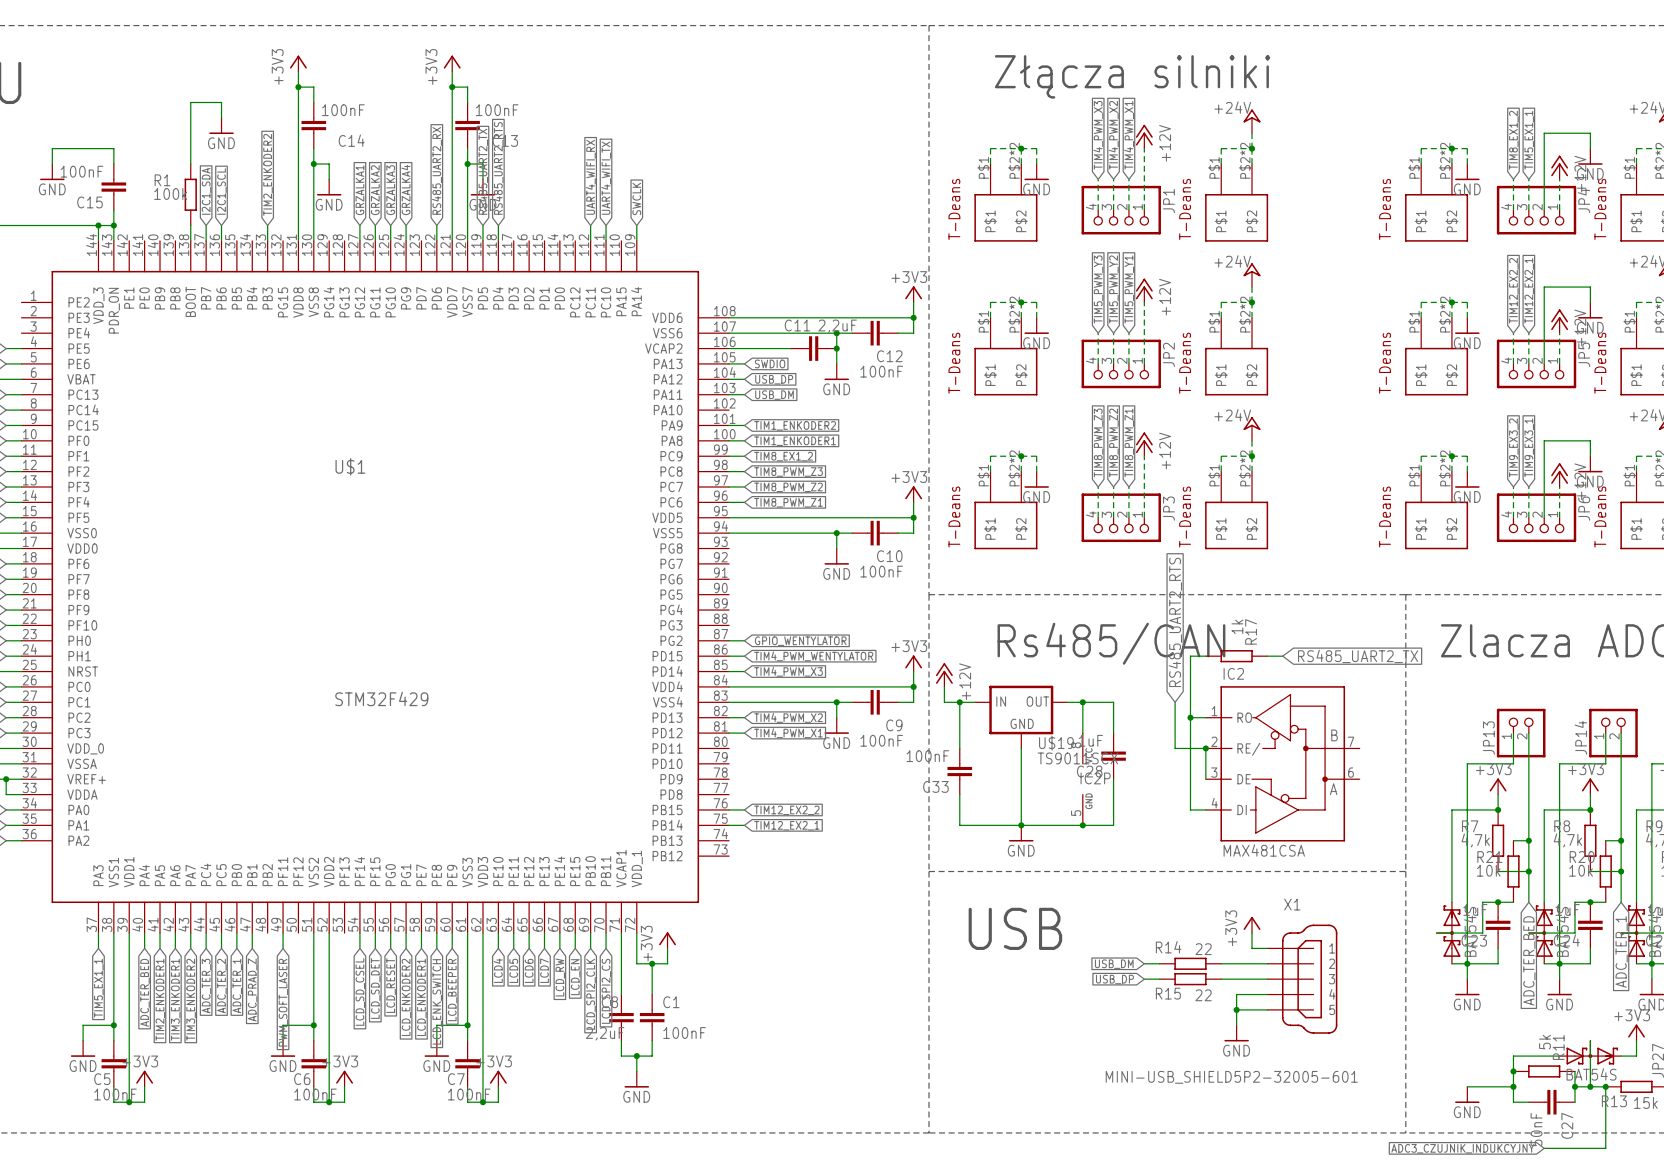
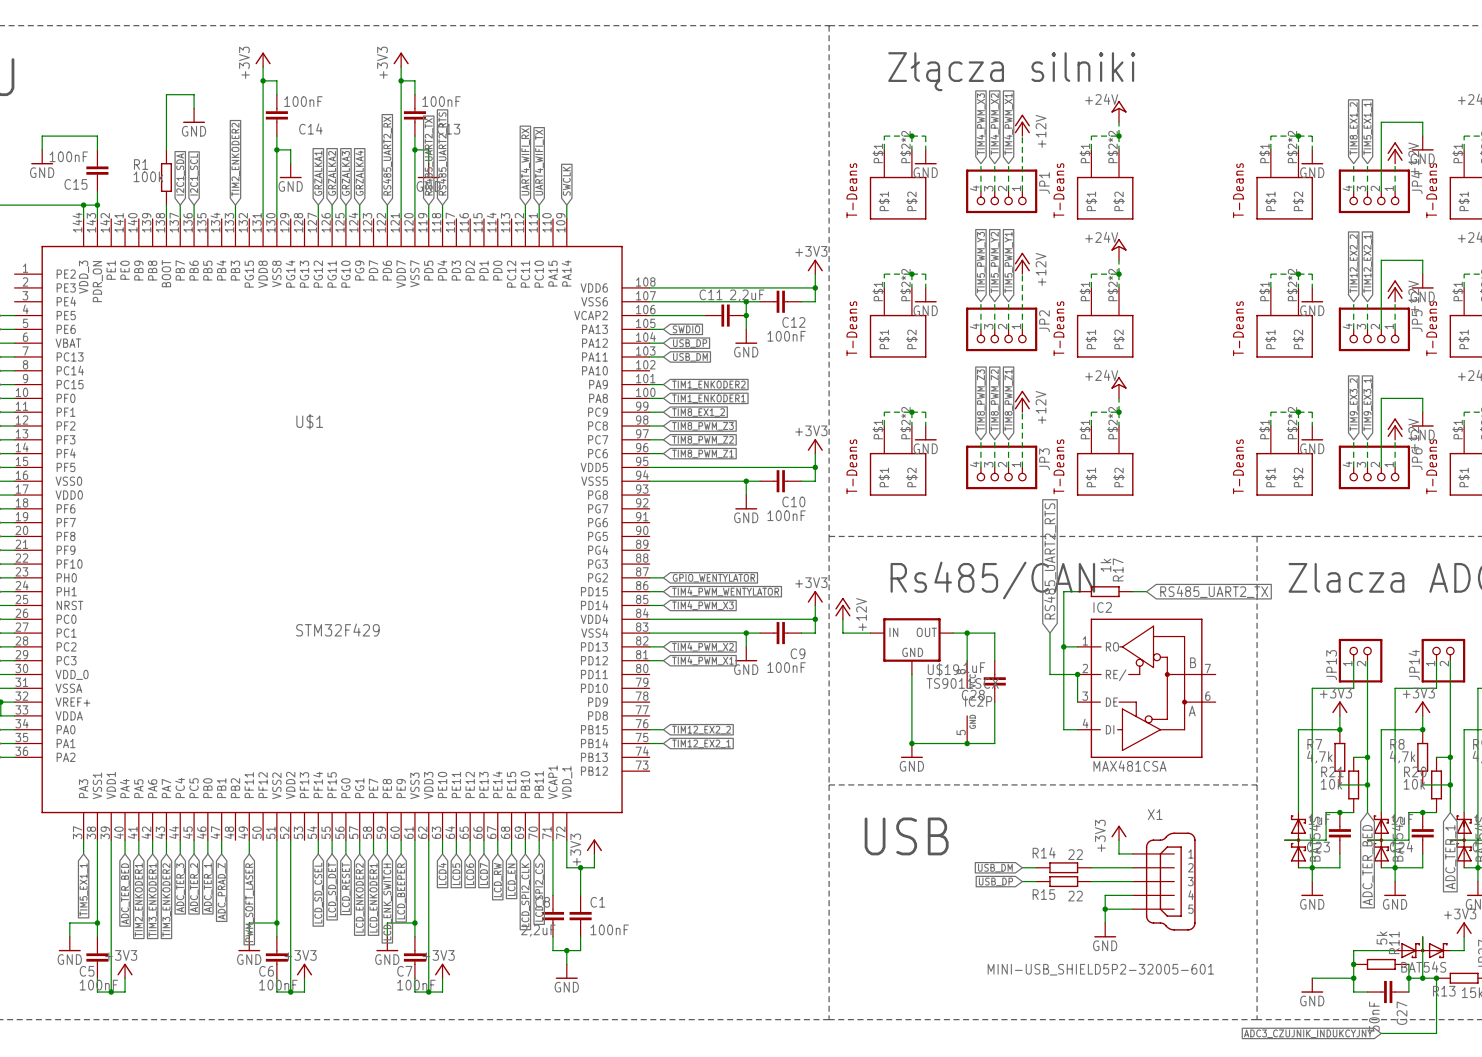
wire: (959, 702) (959, 748) -> none
junction: (959, 702) -> none
C33: 100nF (959, 771) -> none
wire: (959, 794) (959, 825) (1021, 825) -> none

